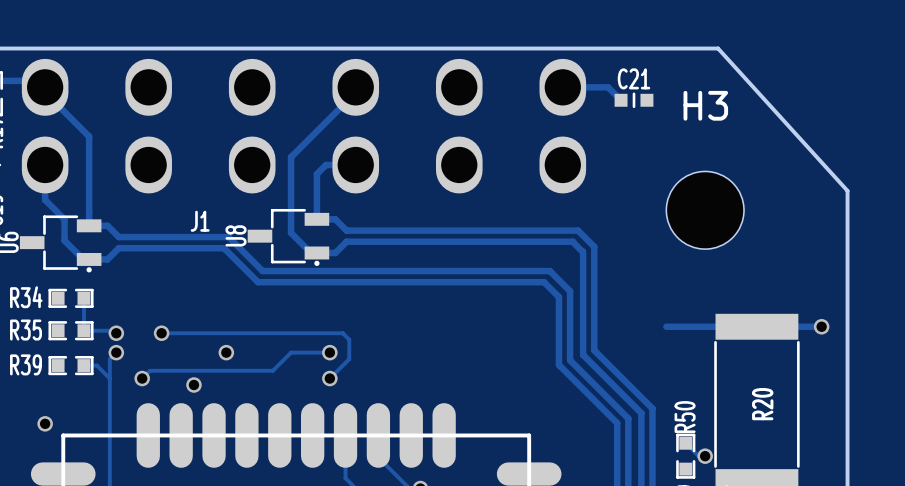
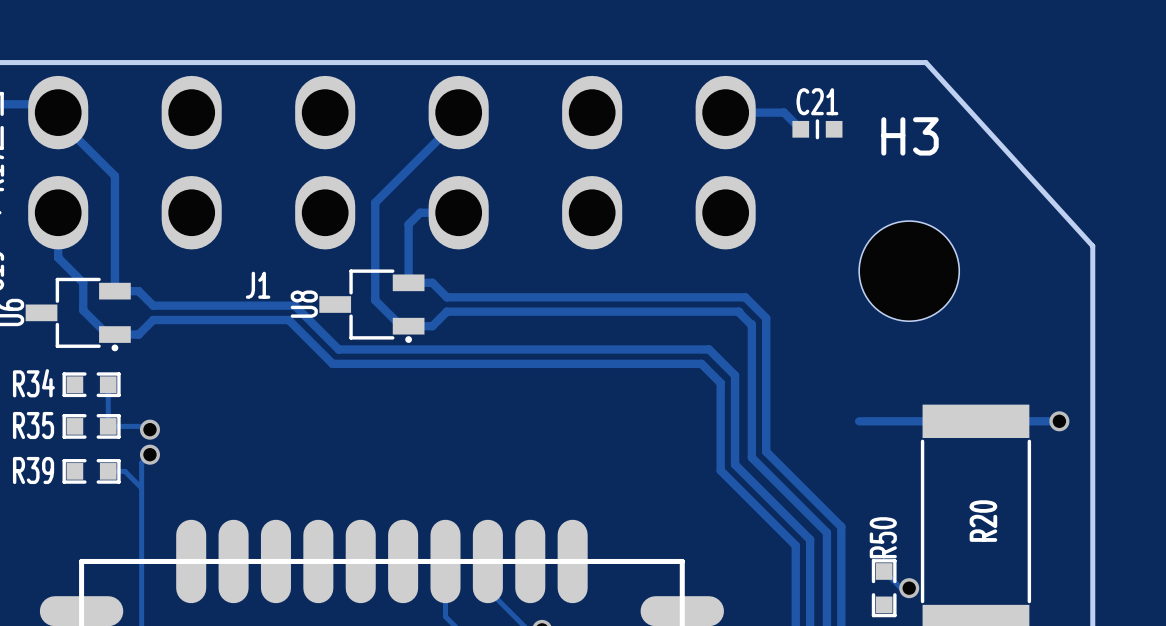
track: (161, 333) (342, 333) (349, 339) (349, 359) (329, 378) -> none
via: (161, 333) -> none
via: (226, 352) -> none
track: (329, 352) (291, 352) (272, 370) (149, 370) (142, 378) -> none
via: (329, 352) -> none
via: (142, 378) -> none
via: (329, 378) -> none
via: (193, 385) -> none
via: (45, 423) -> none

